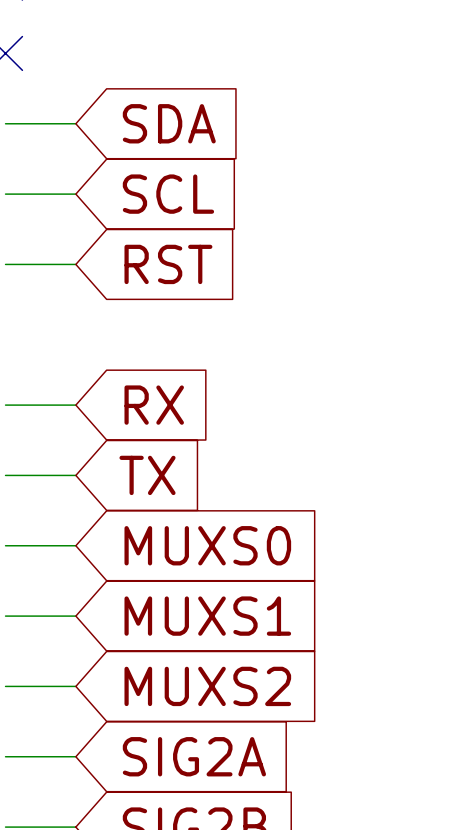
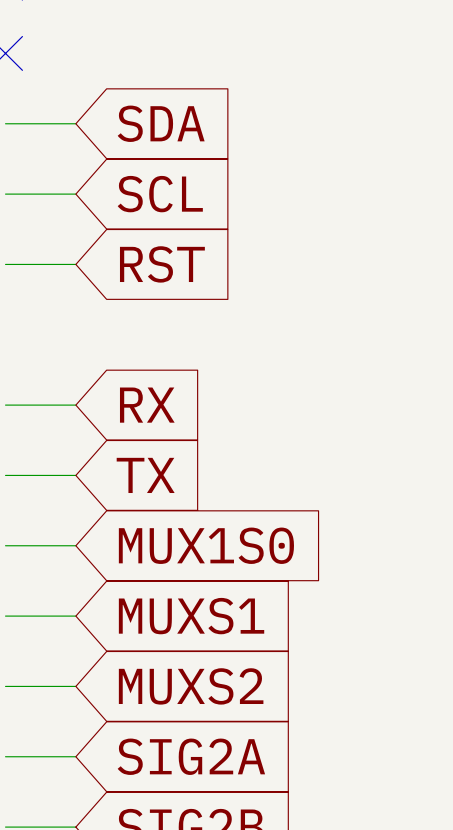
global label: MUXS0 (207, 545) -> MUX1S0 (206, 545)

